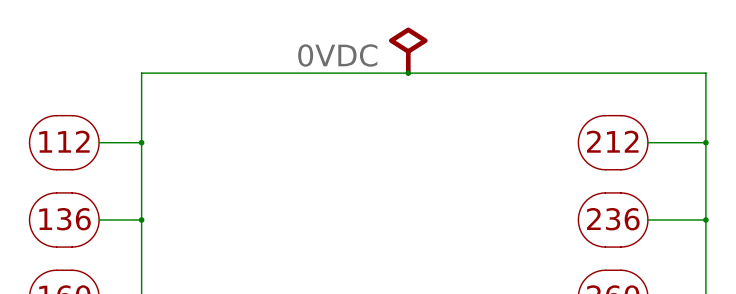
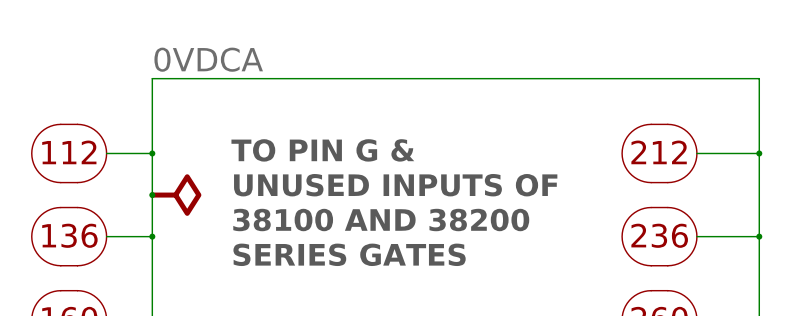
power symbol: (408, 51) -> none
label: none -> 0VDCA (208, 59)
label: 0VDC (337, 55) -> none
junction: (408, 73) -> none
text: none -> TO PIN G & (322, 150)
text: none -> UNUSED INPUTS OF (395, 185)
junction: none -> (152, 195)
power symbol: none -> (175, 195)
text: none -> 38100 AND 38200 (381, 220)
text: none -> SERIES GATES (349, 254)

